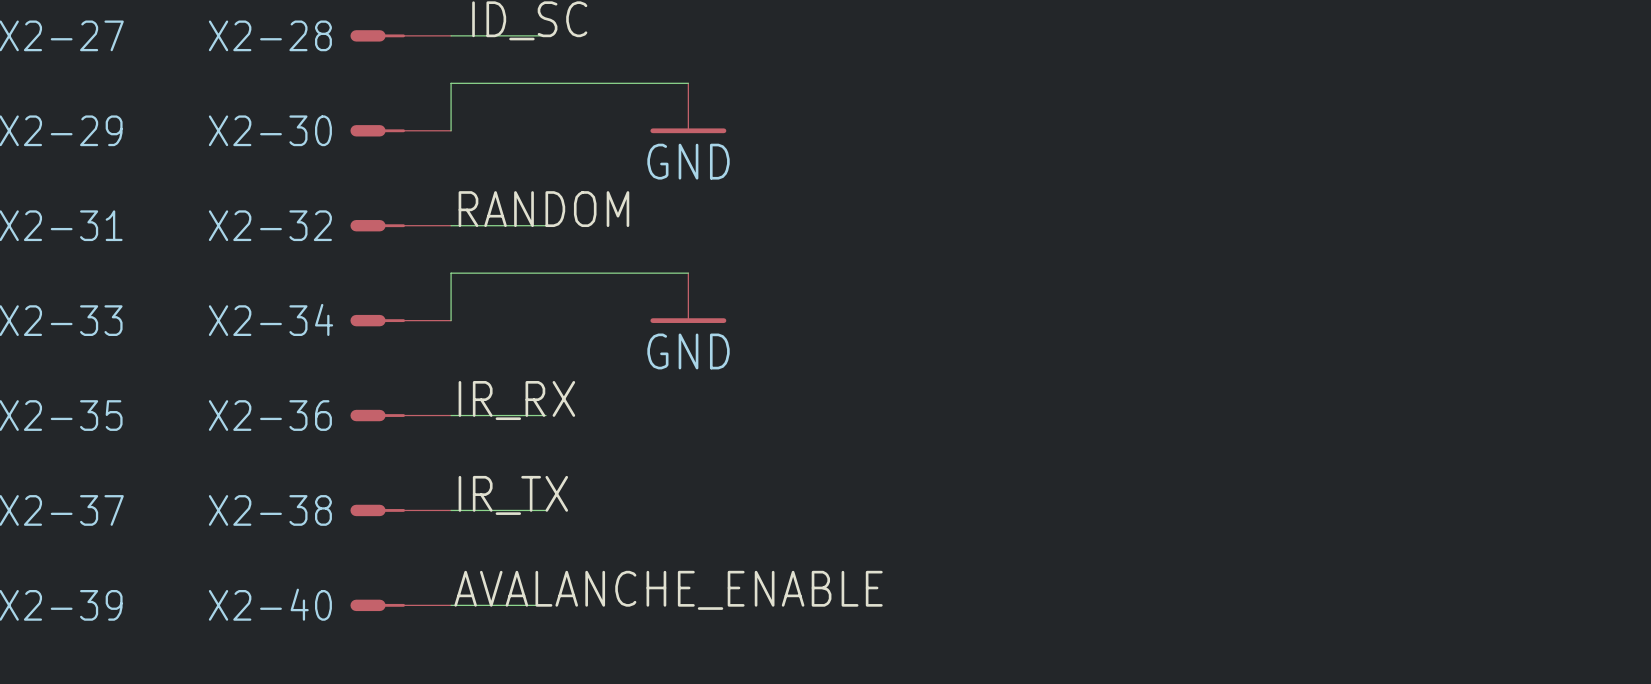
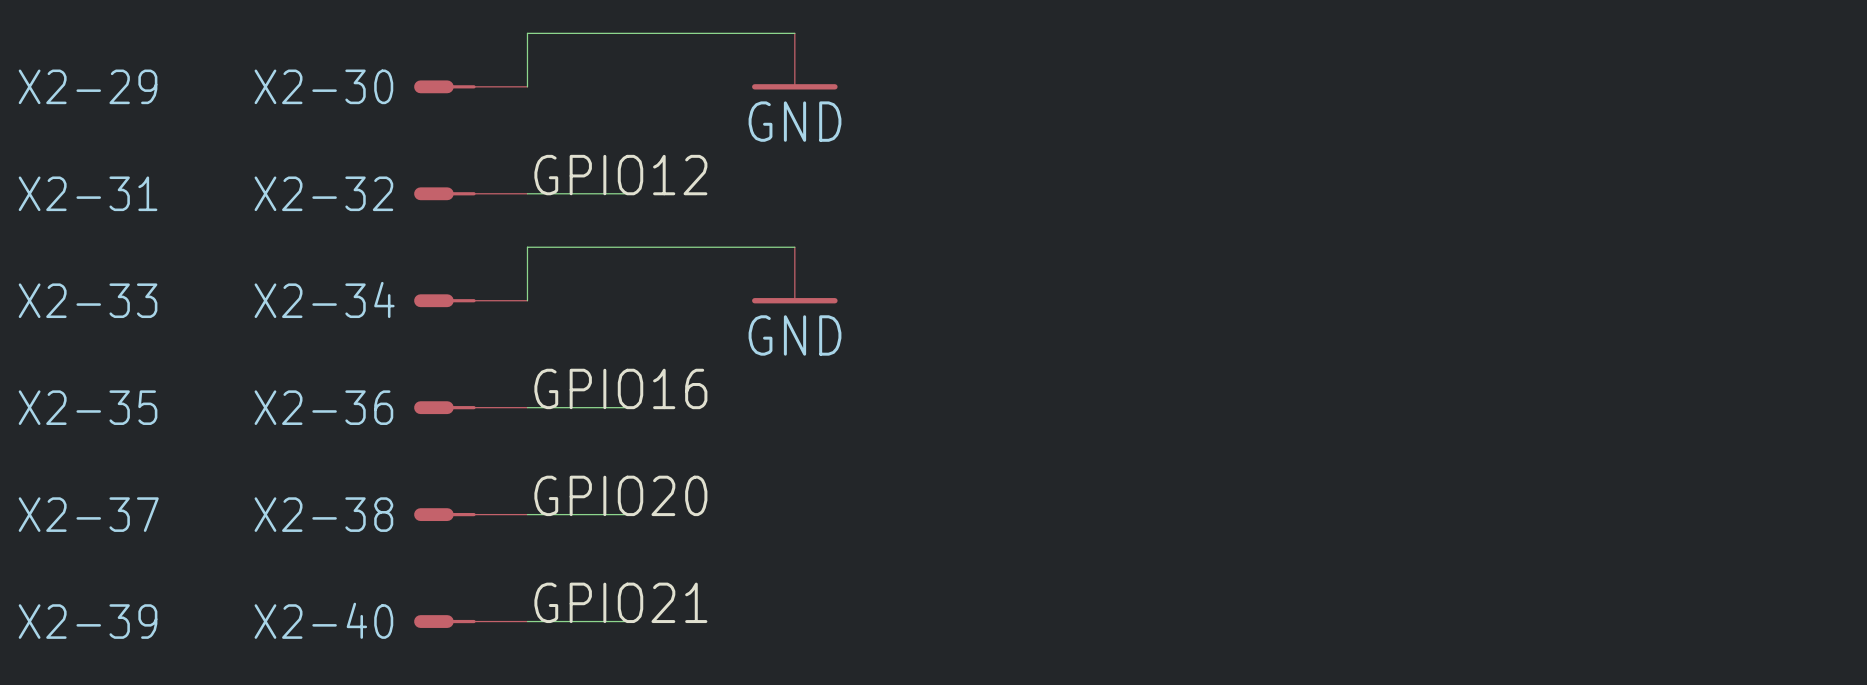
label: RANDOM (543, 209) -> GPIO12 (620, 175)
label: IR_RX (516, 400) -> GPIO16 (620, 388)
label: IR_TX (513, 495) -> GPIO20 (620, 495)
label: AVALANCHE_ENABLE (668, 590) -> GPIO21 (620, 602)

